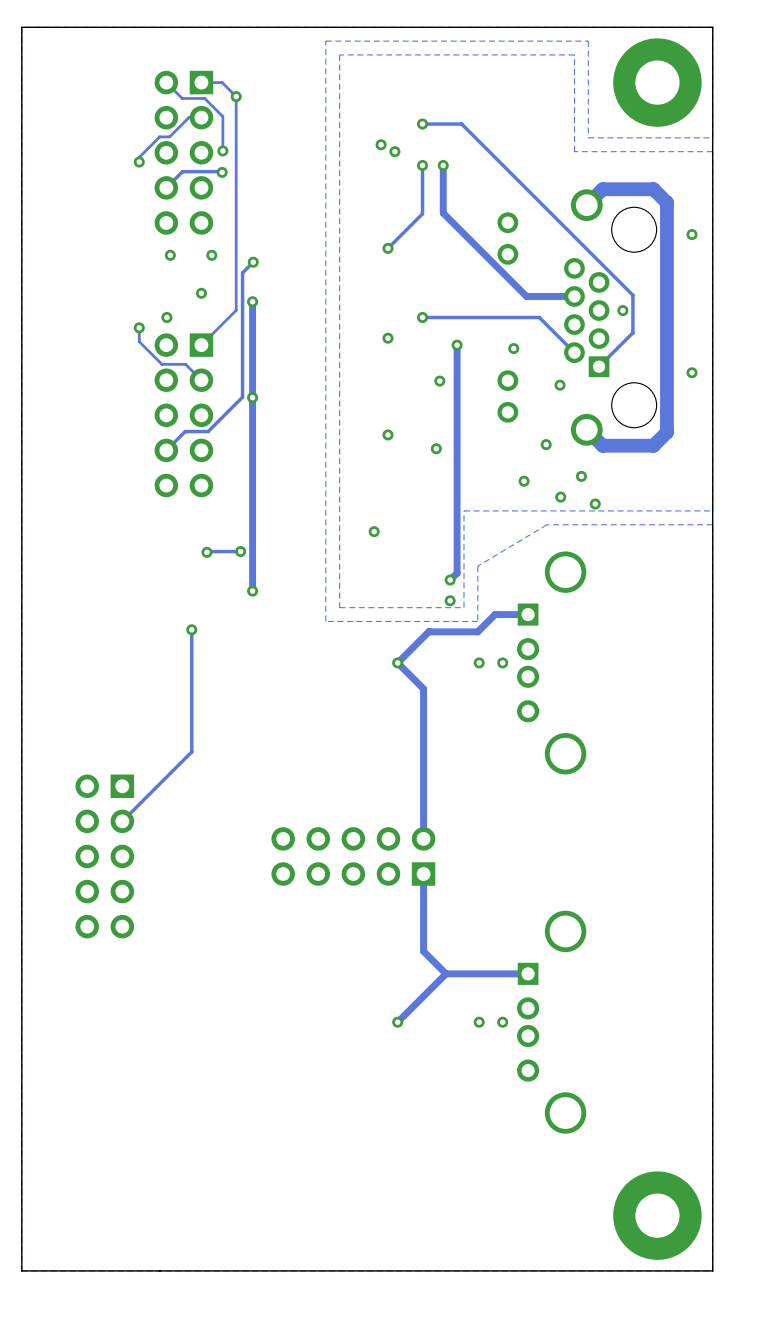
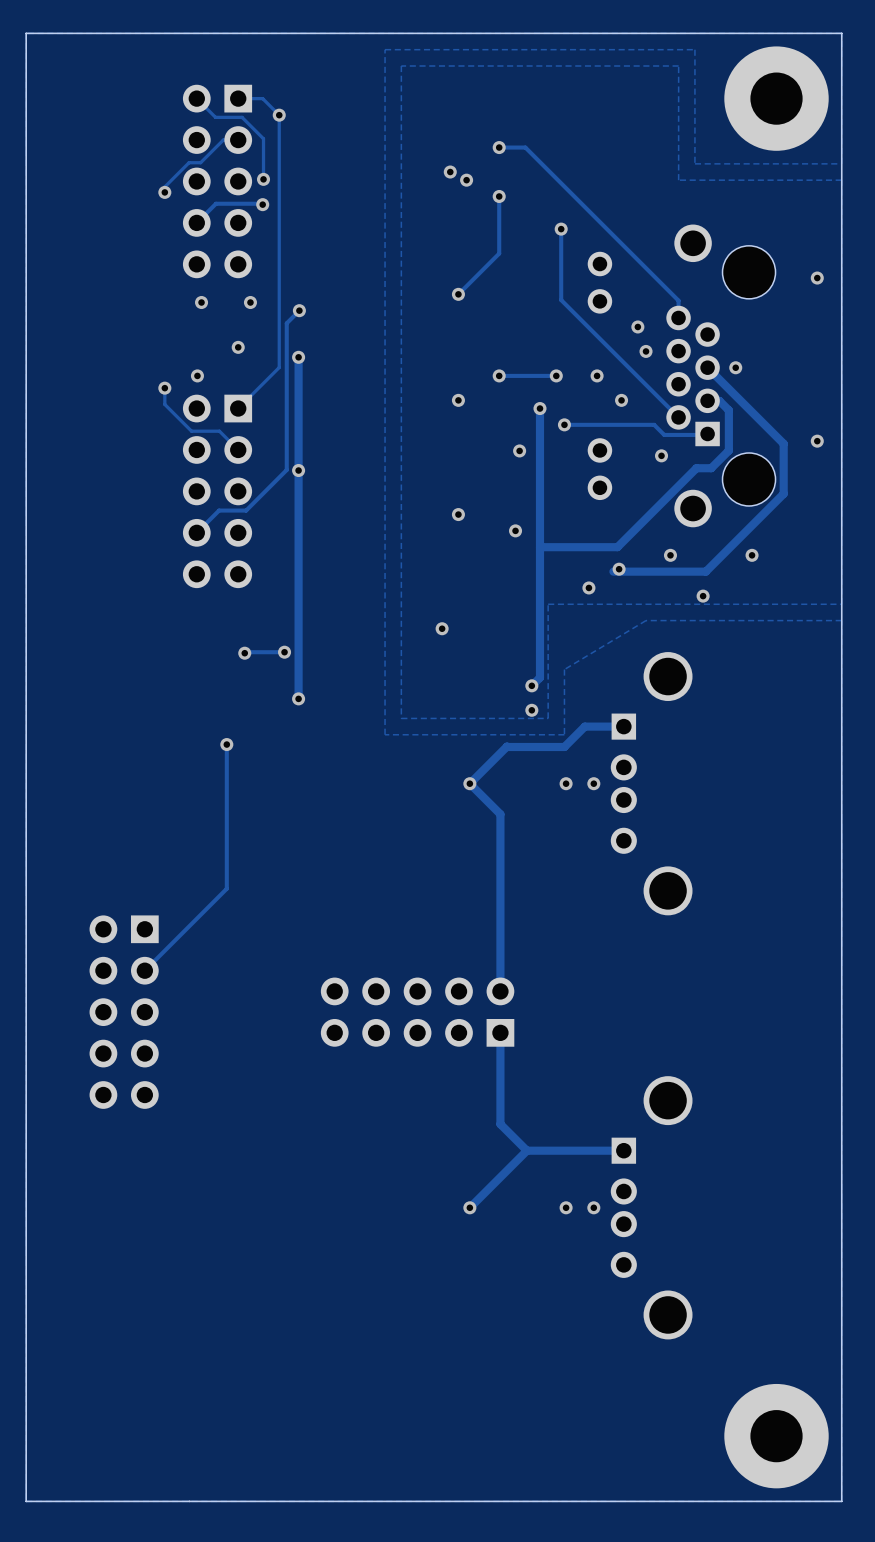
track: (444, 124) (461, 124) (632, 295) (632, 332) (599, 366) -> (525, 147) (678, 300) (678, 317)
track: (443, 165) (443, 213) (526, 296) (574, 296) -> none
via position: (443, 165) -> (561, 229)
track: (586, 205) (602, 189) (653, 189) (666, 202) (666, 432) (653, 445) (602, 445) (586, 429) -> none
via: none -> (637, 326)
via: none -> (646, 351)
track: none -> (707, 367) (783, 443) (783, 493) (705, 571) (613, 571)
via: none -> (556, 375)
via: none -> (597, 375)
track: (539, 317) (470, 317) -> (637, 375) (561, 300) (561, 229)
via: none -> (621, 400)
track: none -> (707, 400) (719, 400) (728, 410) (728, 450) (711, 468) (696, 468) (617, 547) (539, 547)
via: (513, 348) -> none
track: none -> (564, 424) (654, 424) (664, 434) (707, 433)
via: none -> (564, 424)
via: (546, 444) -> none
via: none -> (670, 555)
via: none -> (752, 555)
via: (581, 476) -> none
via: none -> (588, 587)
via: (560, 497) -> none

